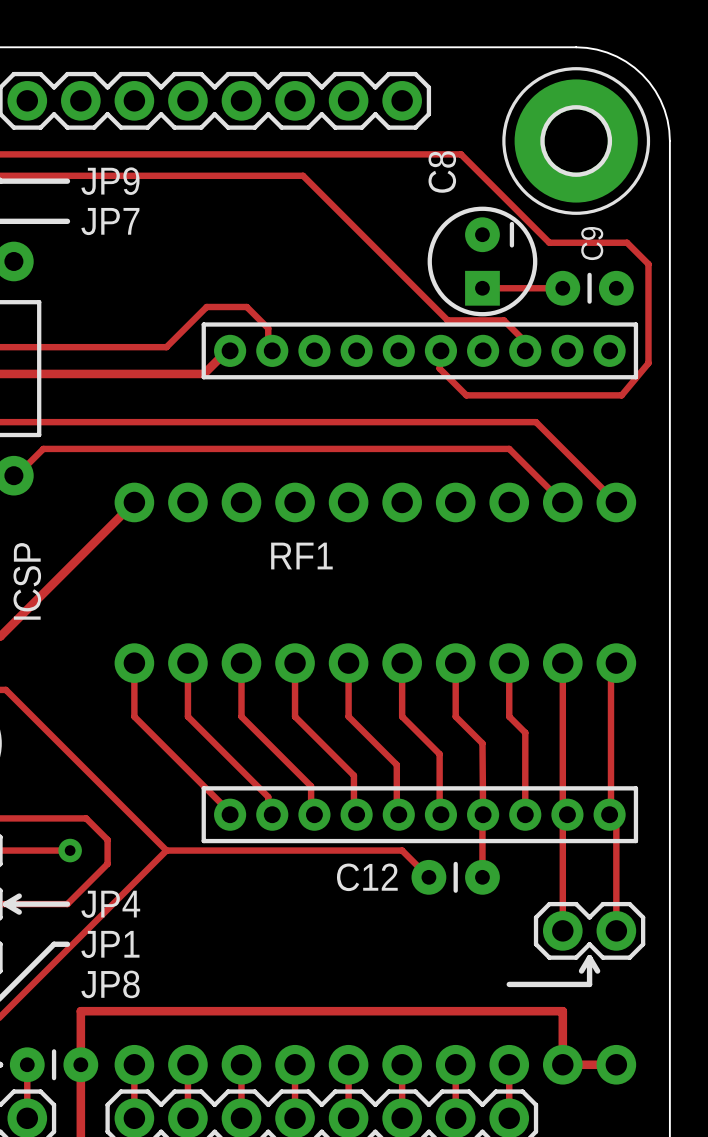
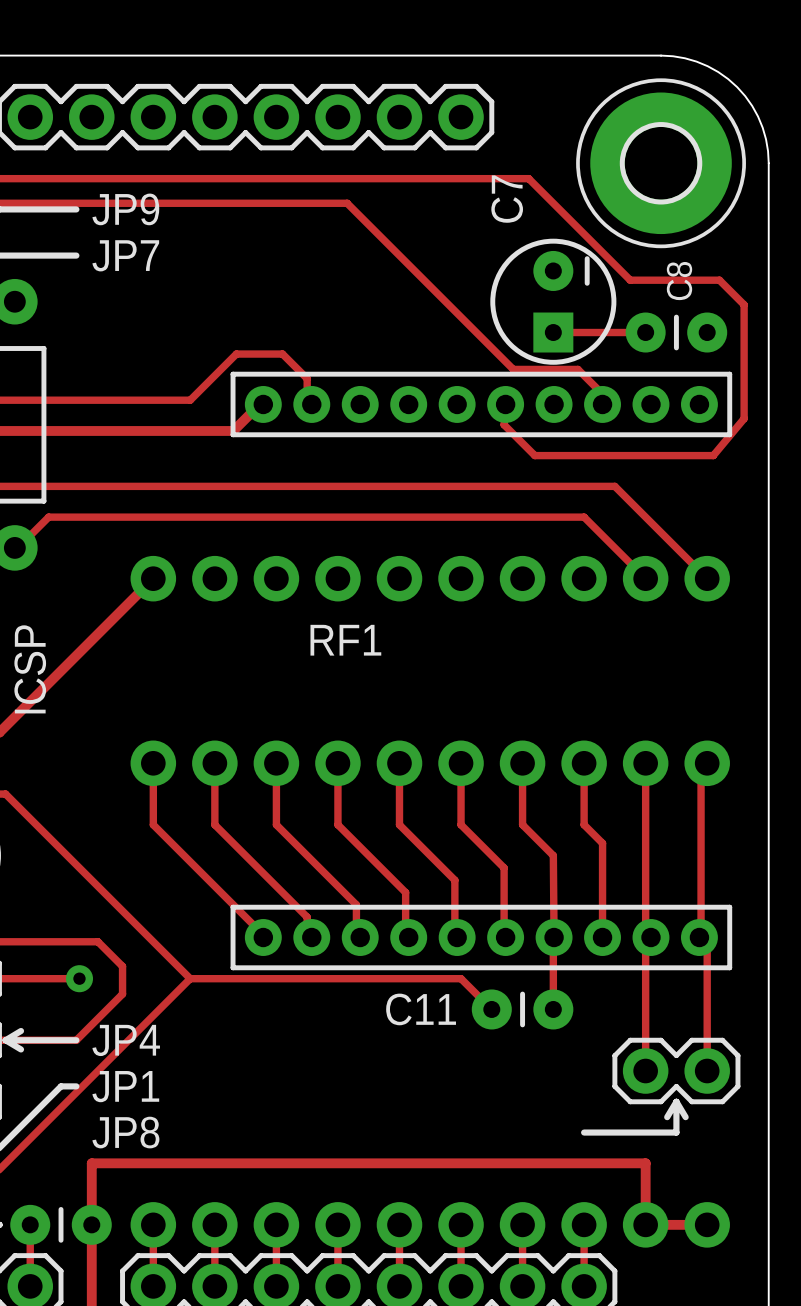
C8 name: C8 (442, 172) -> C7 (507, 199)
C9 name: C9 (592, 243) -> C8 (679, 281)
C12 name: C12 (367, 877) -> C11 (421, 1009)

